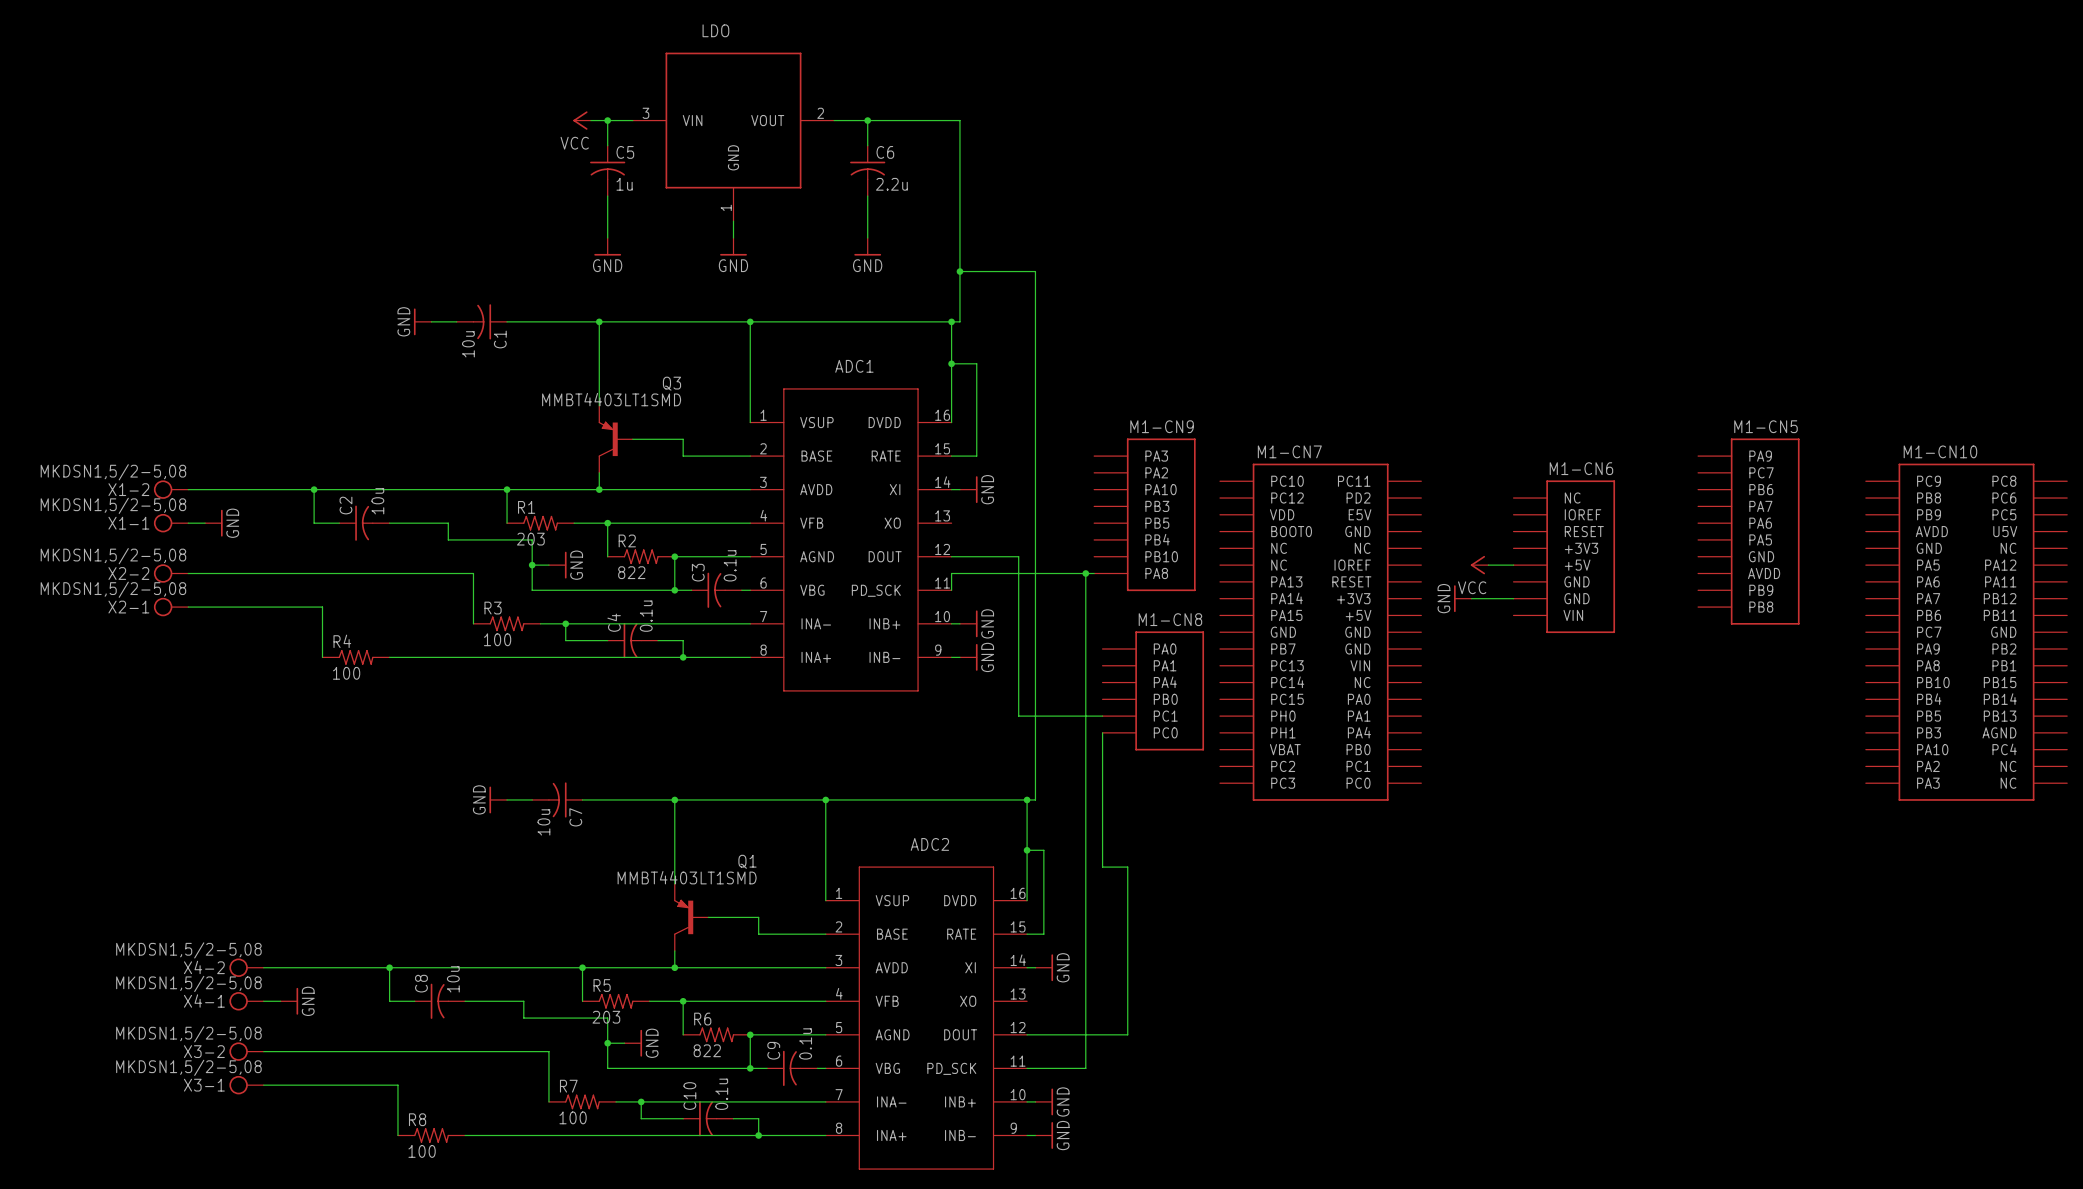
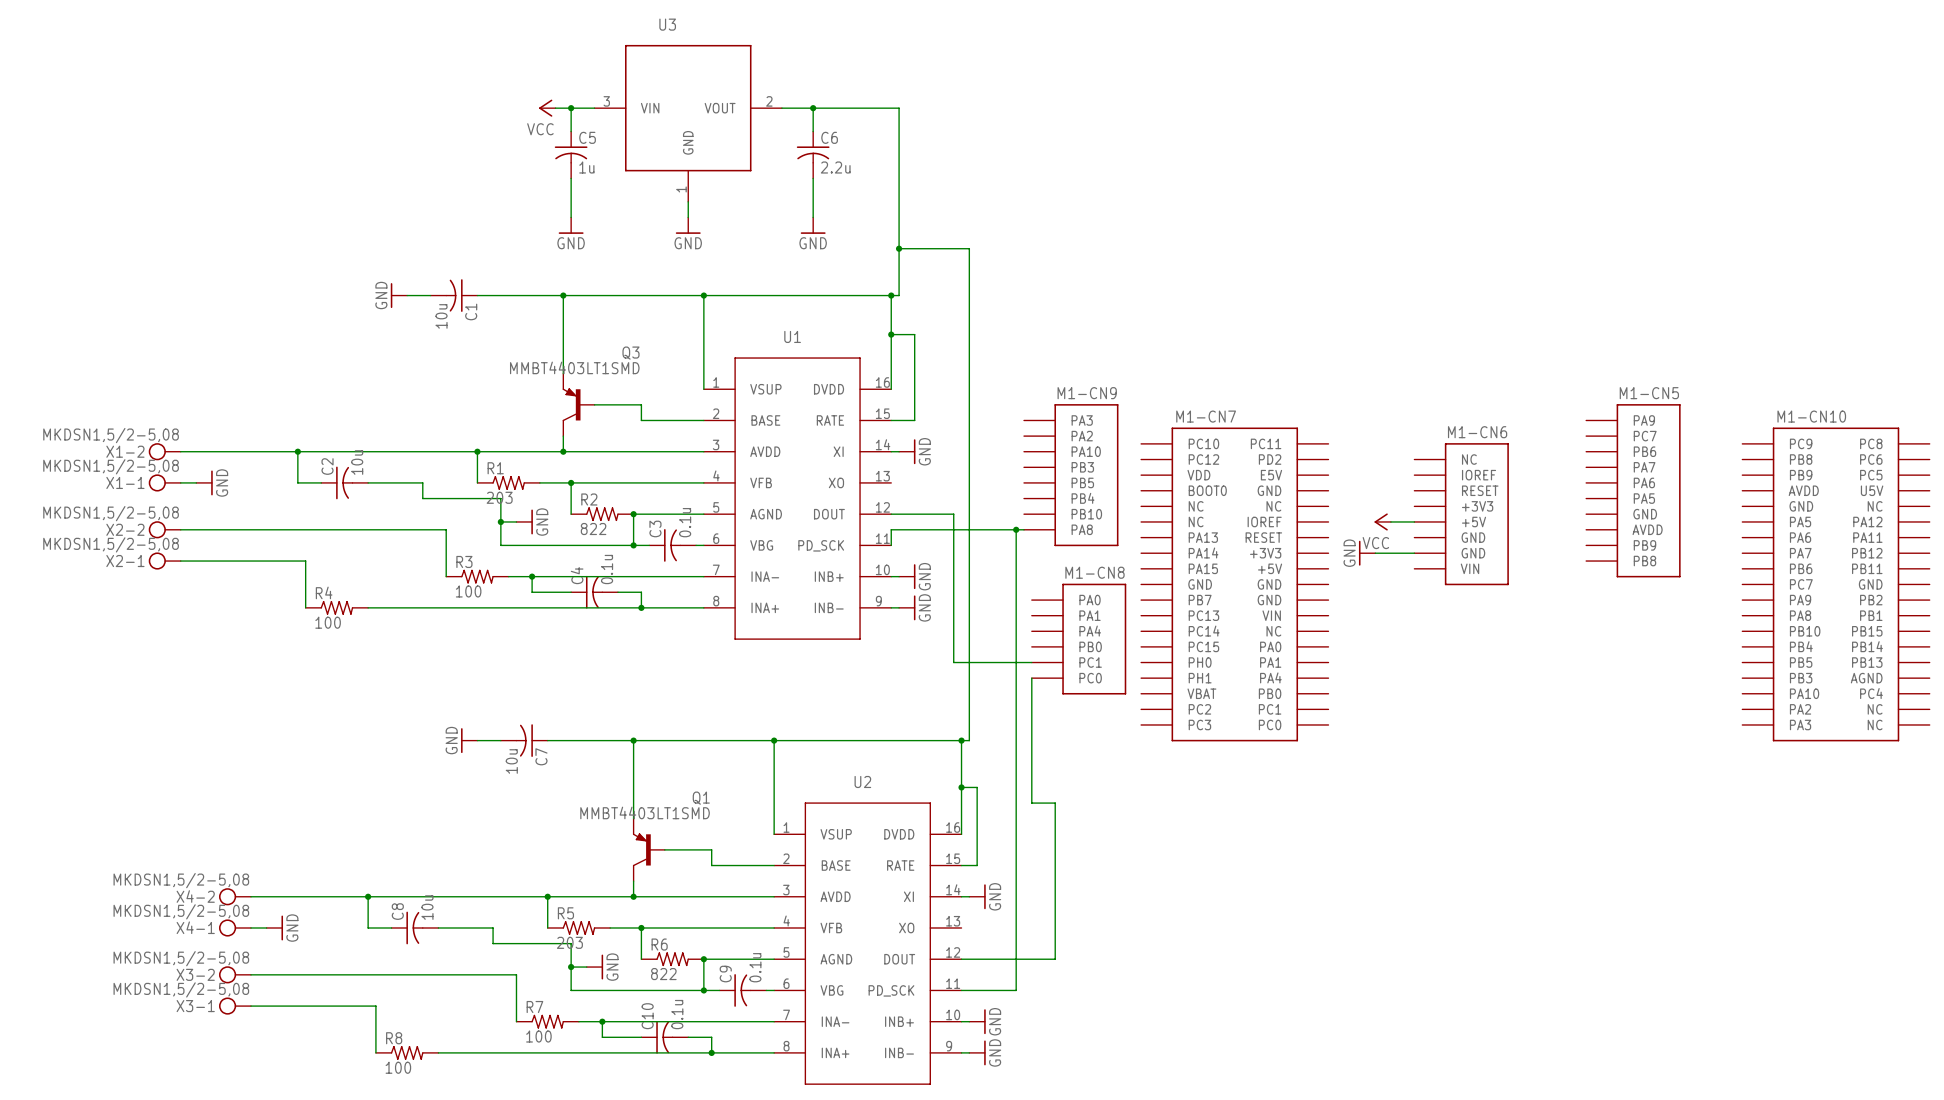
LDO name: LDO (715, 30) -> U3 (667, 24)
ADC1 name: ADC1 (854, 366) -> U1 (792, 336)
ADC2 name: ADC2 (929, 844) -> U2 (862, 781)

